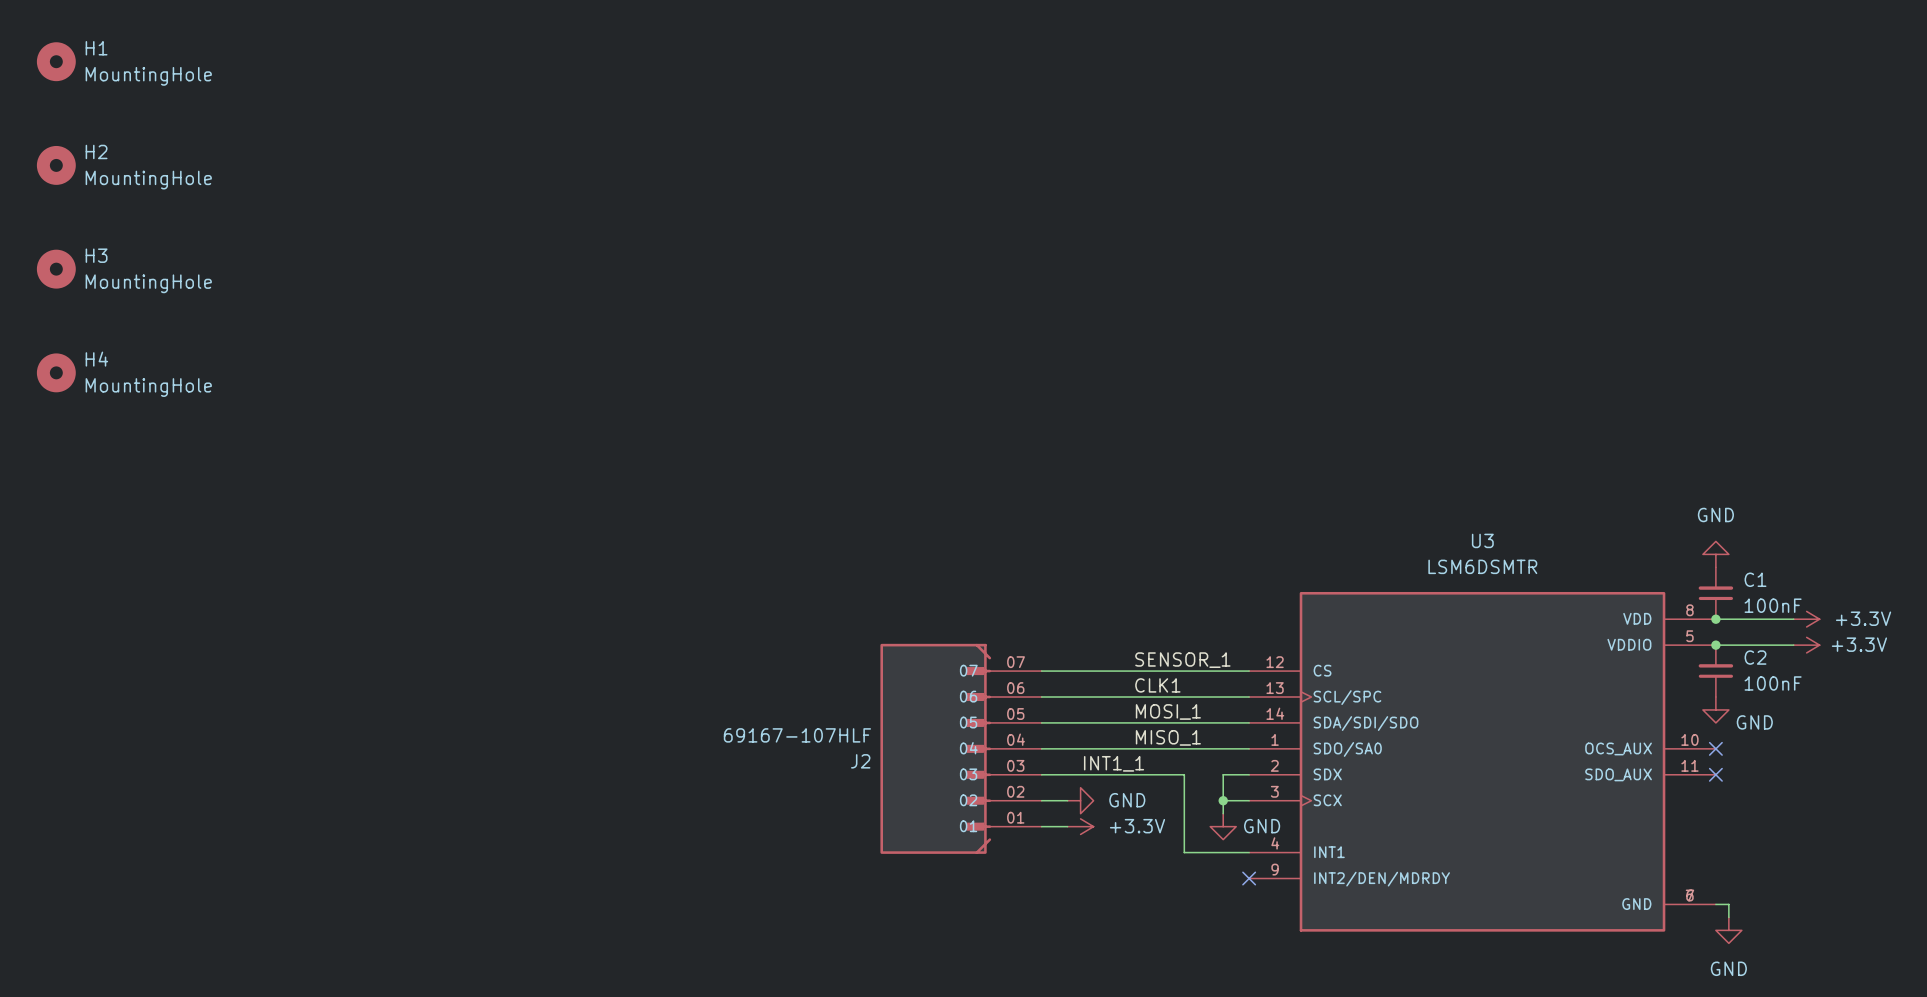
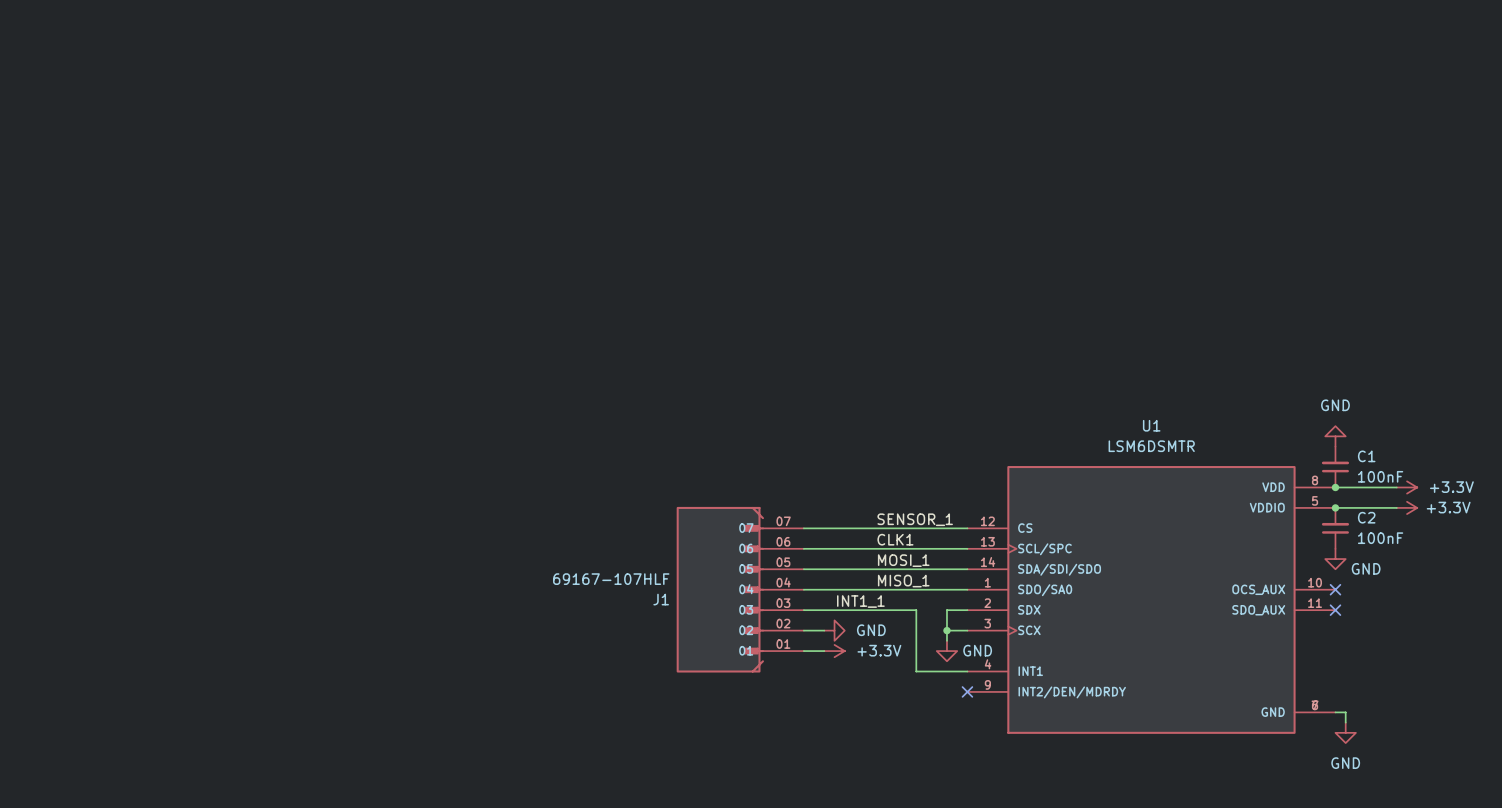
H1: MountingHole (56, 61) -> none
H2: MountingHole (56, 165) -> none
H3: MountingHole (56, 269) -> none
H4: MountingHole (56, 372) -> none
U3 name: U3 (1482, 540) -> U1 (1151, 425)
J2 name: J2 (860, 761) -> J1 (661, 599)

